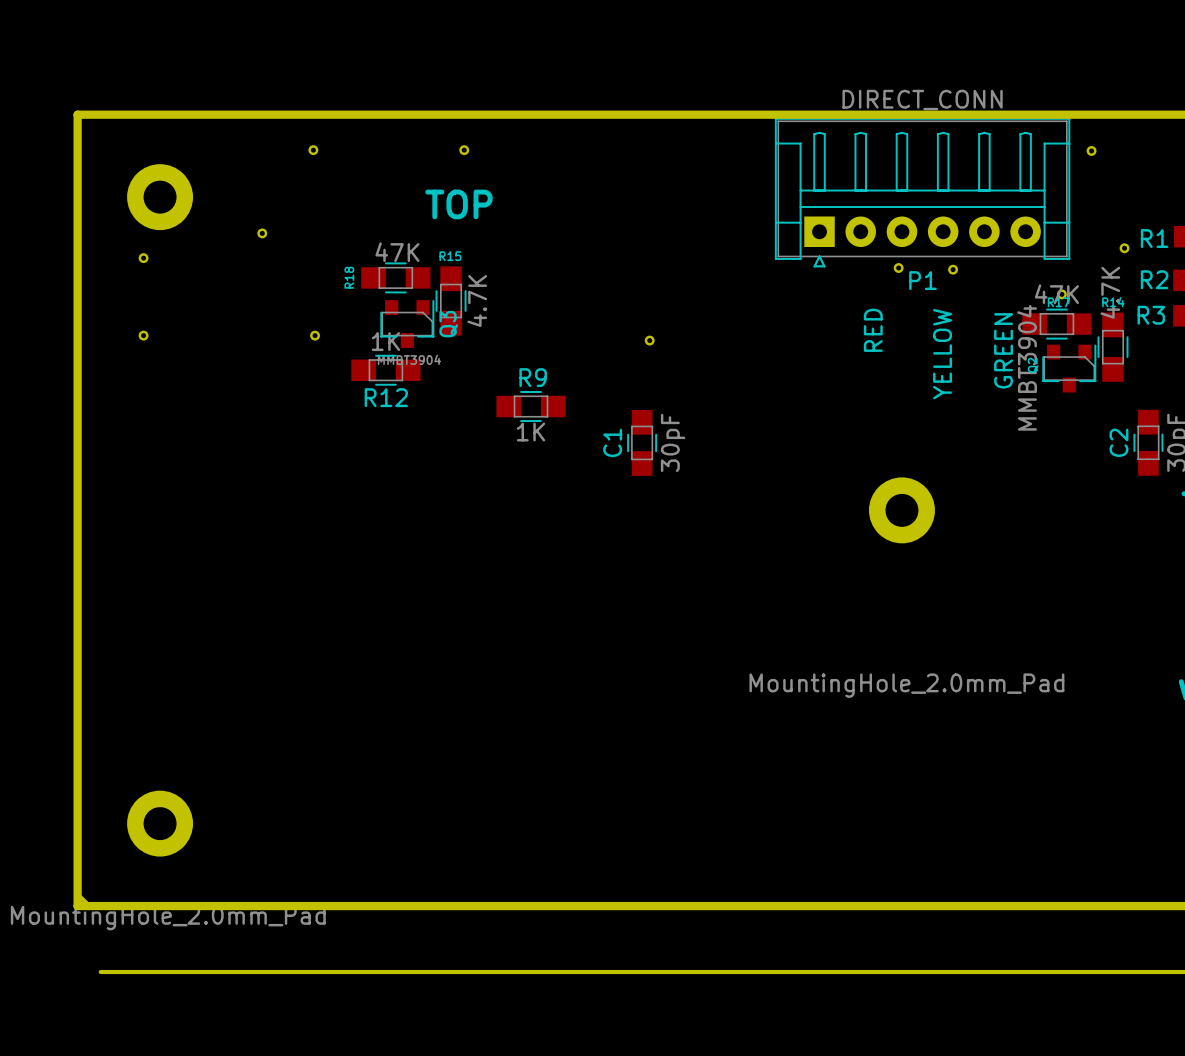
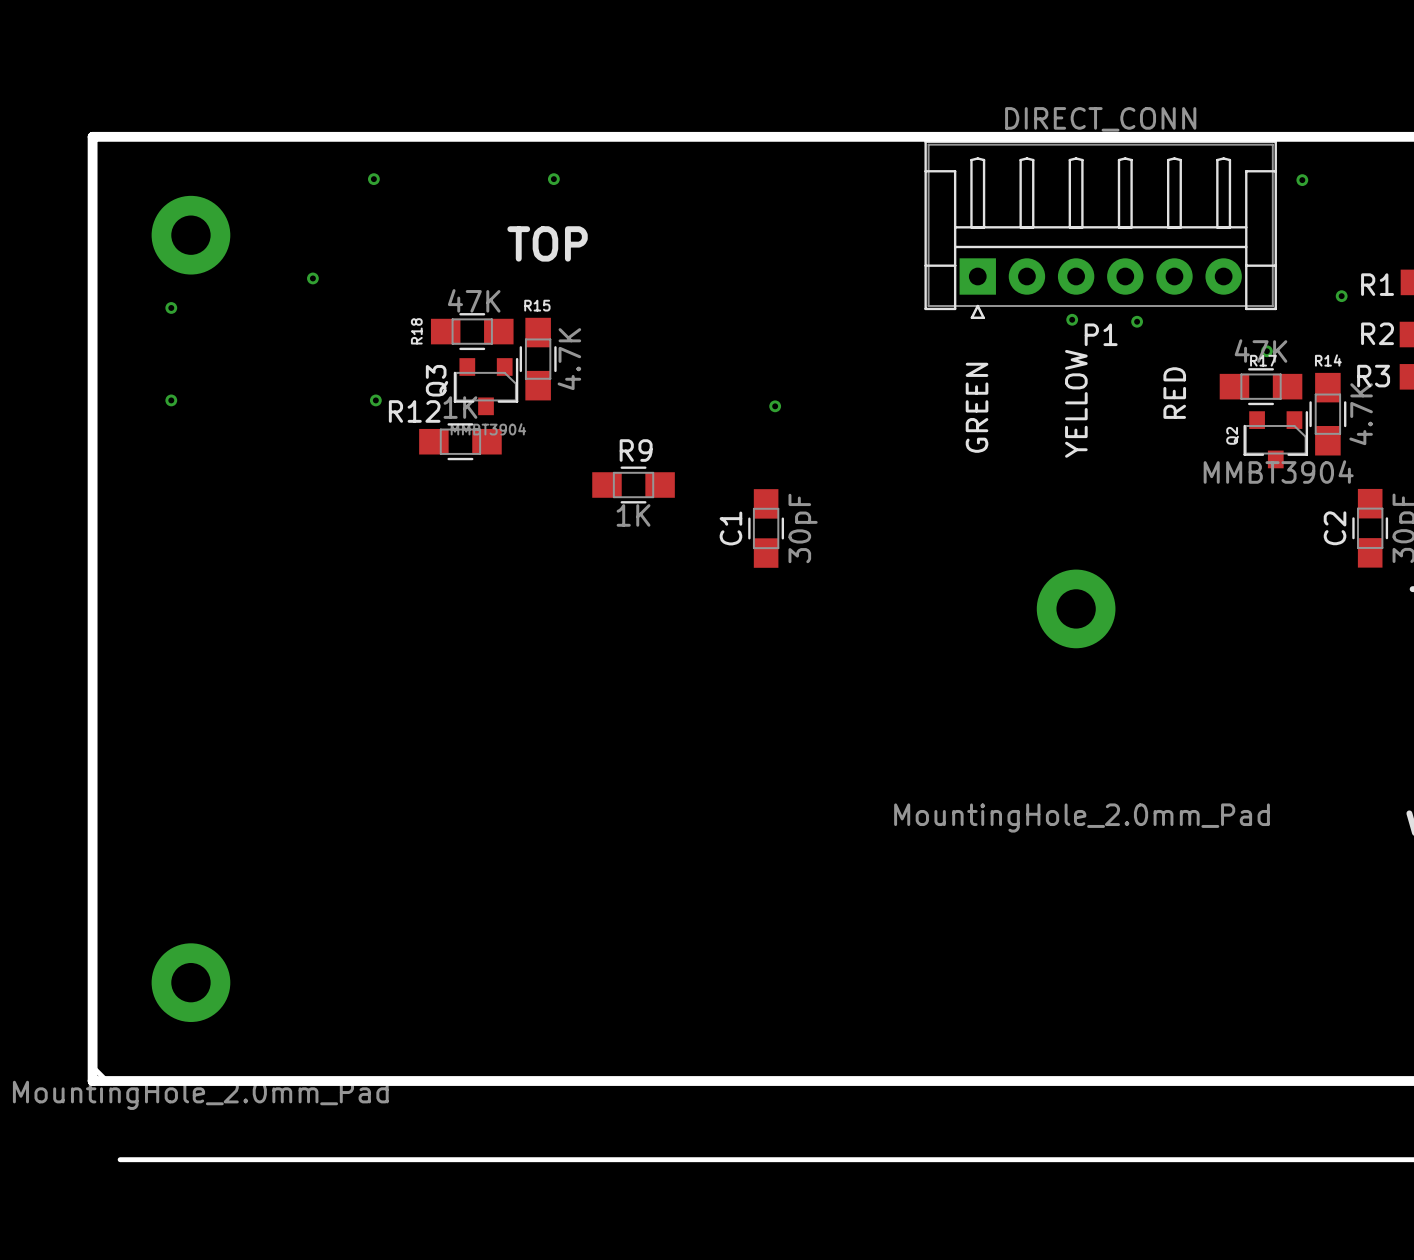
R14 value position: 4.7K (1110, 292) -> 4.7K (1361, 414)
Q3 name position: Q3 (448, 324) -> Q3 (437, 380)
text position: RED (873, 330) -> RED (1174, 393)
text position: GREEN (1003, 350) -> GREEN (977, 407)
text position: YELLOW (942, 354) -> YELLOW (1076, 403)
Q2 value rotation: 0° (1027, 367) -> 90° clockwise (1278, 471)
R12 name position: R12 (386, 397) -> R12 (414, 411)

